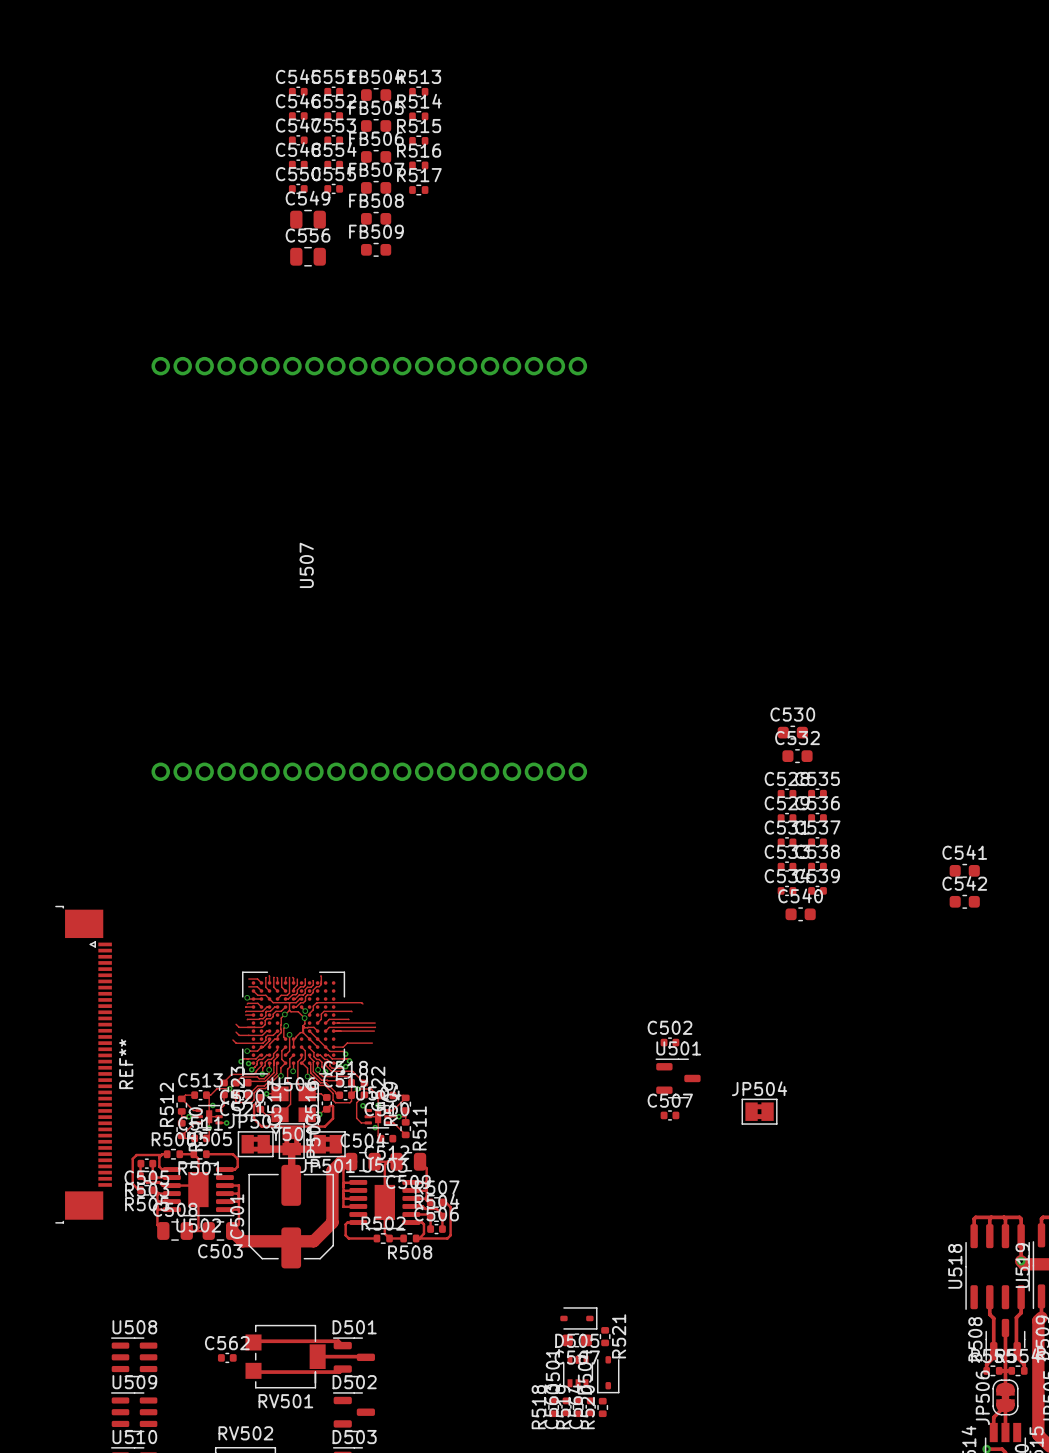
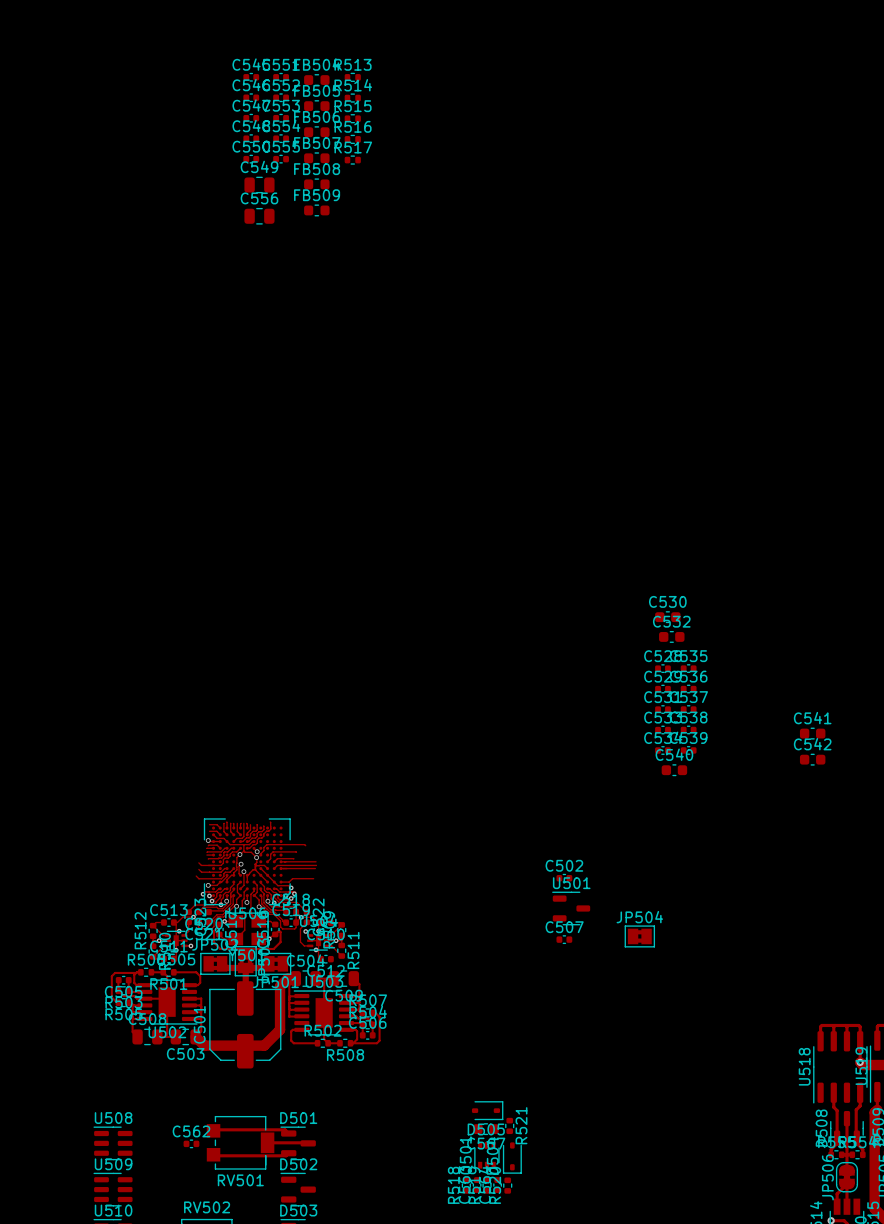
U507: (369, 568) -> none
REF**: (83, 1064) -> none

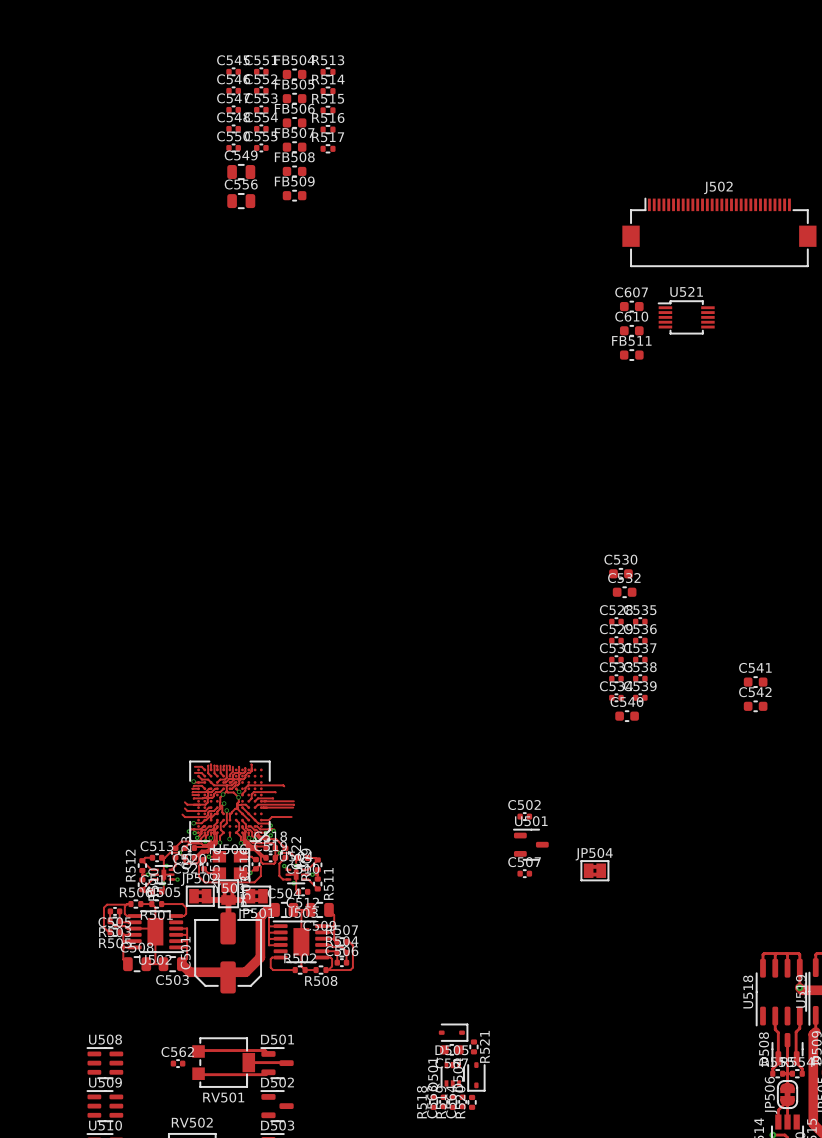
J502: none -> (719, 232)
C607: none -> (631, 306)
U521: none -> (686, 317)
C610: none -> (631, 330)
FB511: none -> (631, 355)
track: (247, 888) (244, 891) (242, 900) (244, 930) (235, 939) -> none
track: (254, 888) (250, 894) (250, 913) (258, 921) -> none

